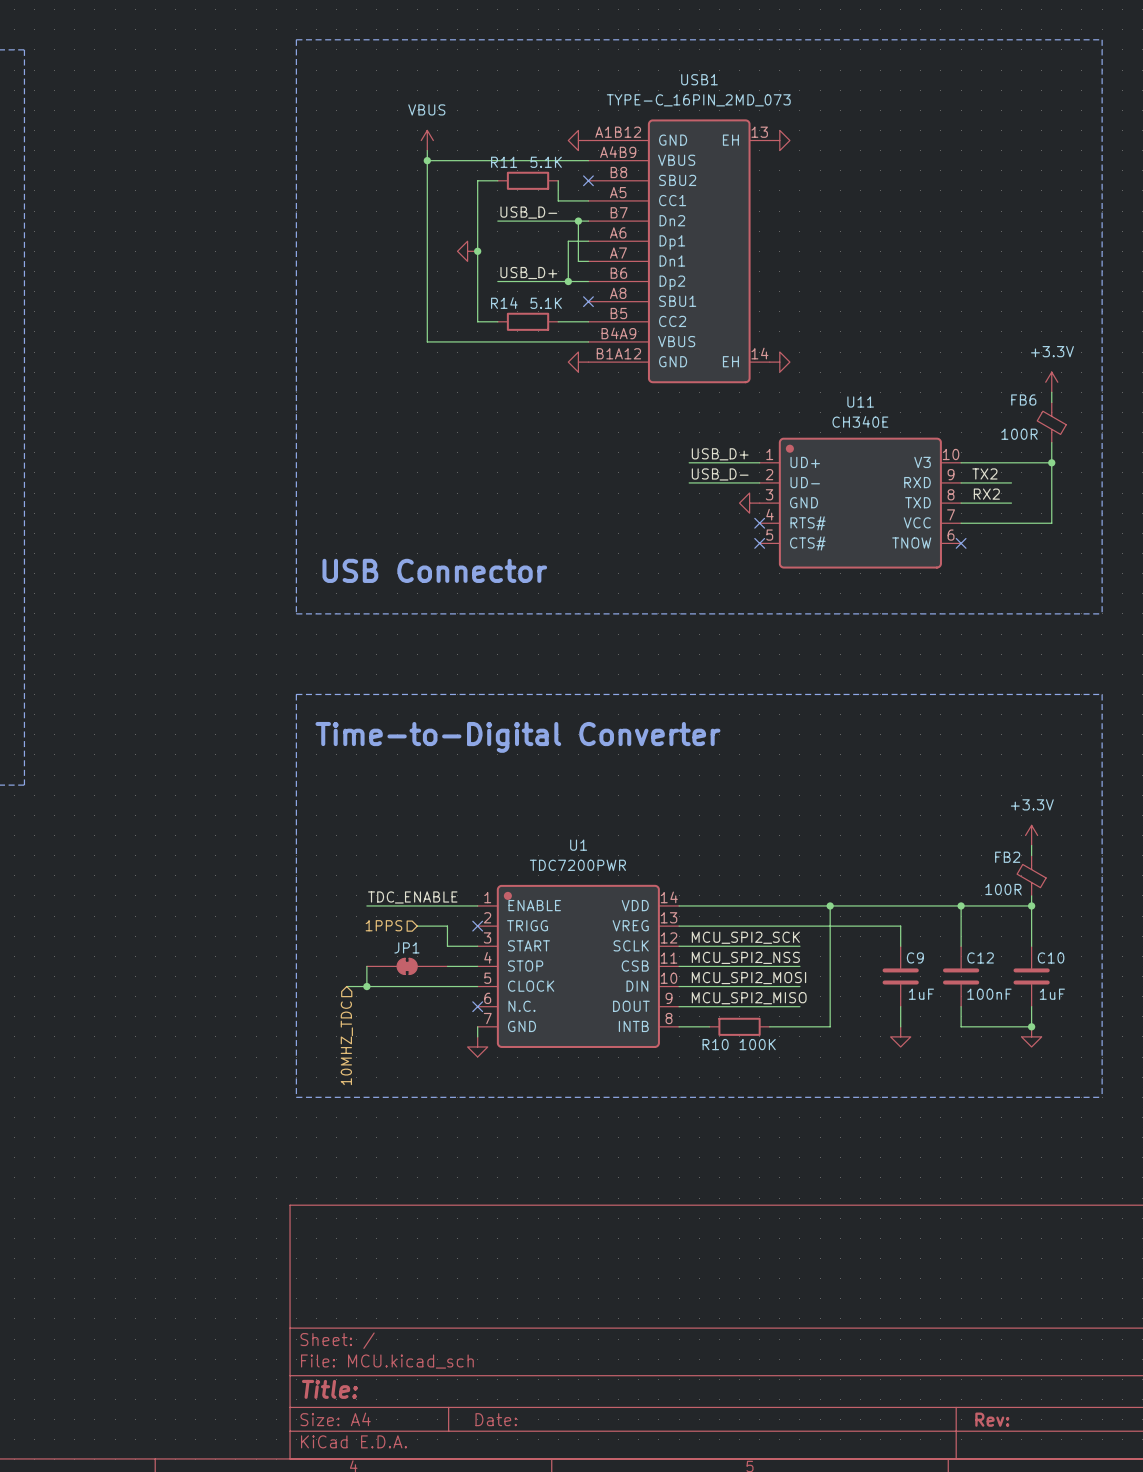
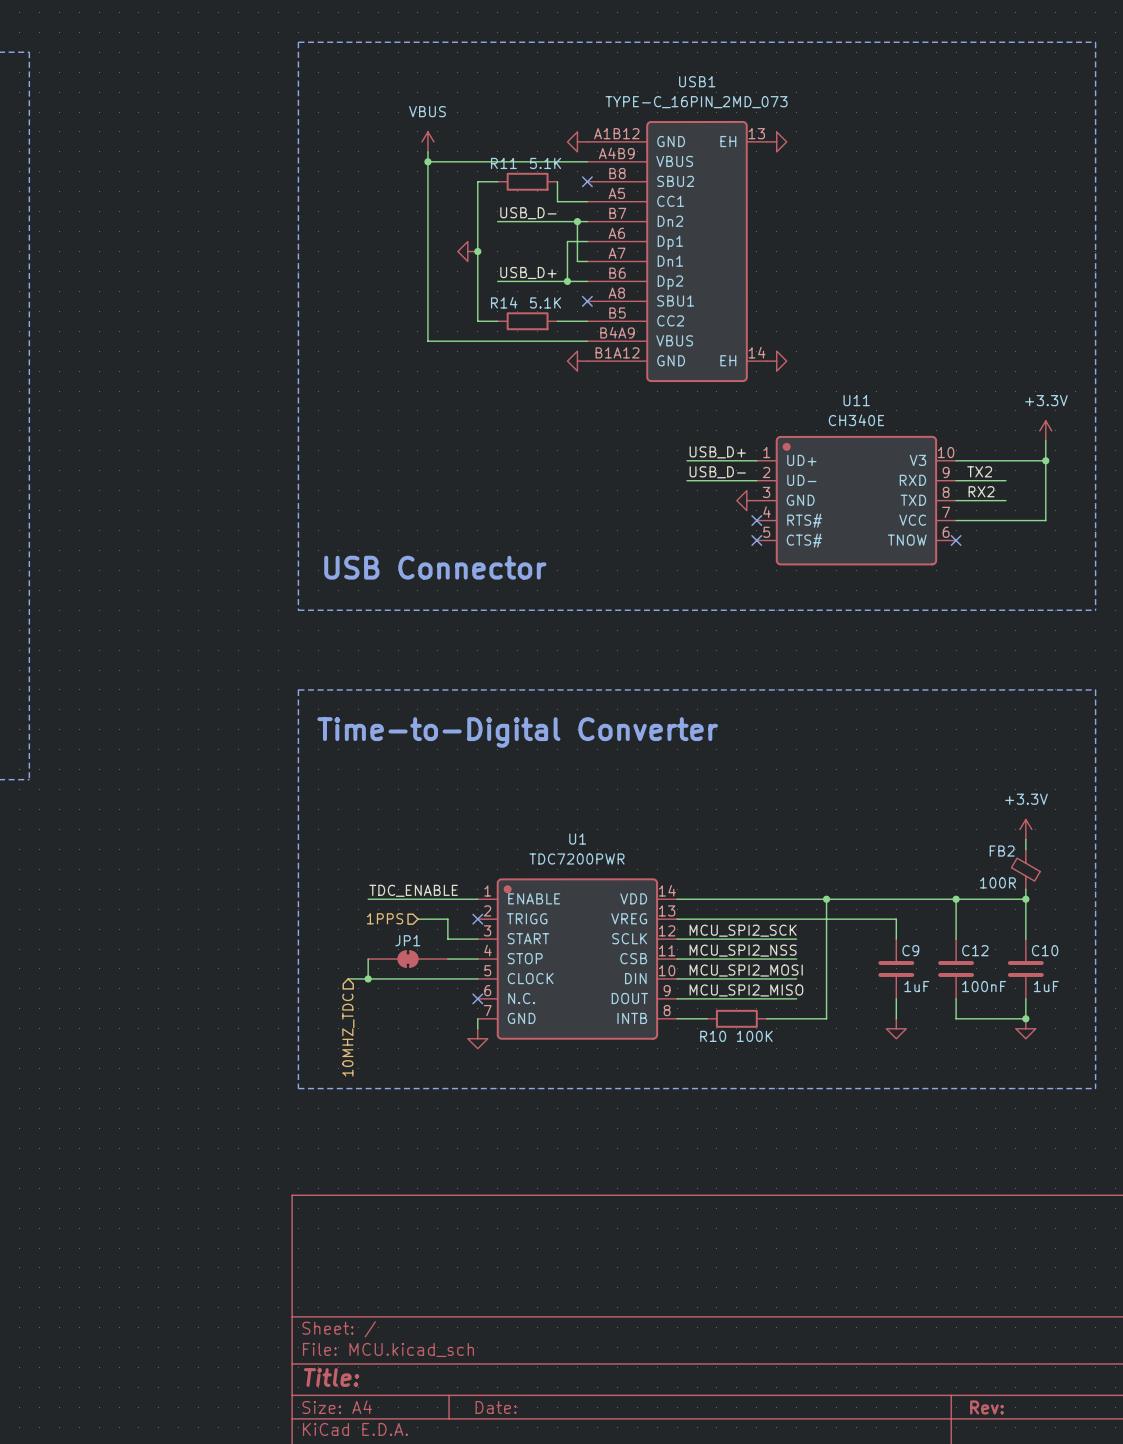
power symbol position: +3.3V (1051, 382) -> +3.3V (1045, 430)
wire: (1051, 392) (1051, 402) -> none
FB6: 100R (1051, 422) -> none

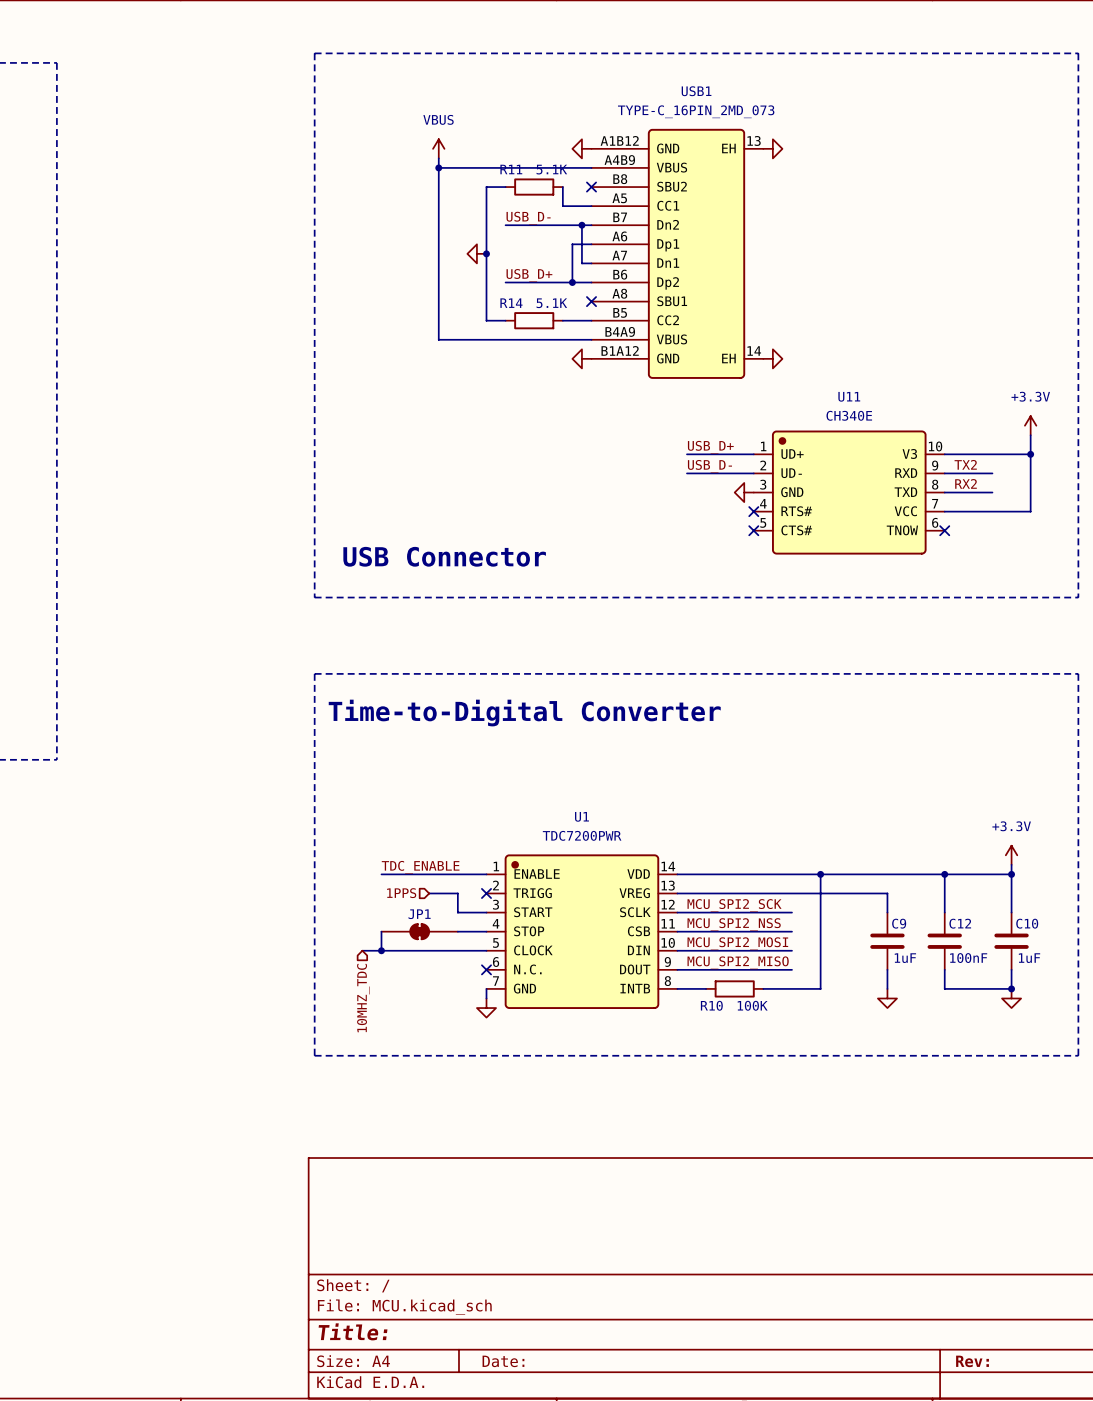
power symbol position: +3.3V (1025, 829) -> +3.3V (1011, 855)
wire: (1025, 839) (1025, 849) -> none
FB2: 100R (1025, 869) -> none

